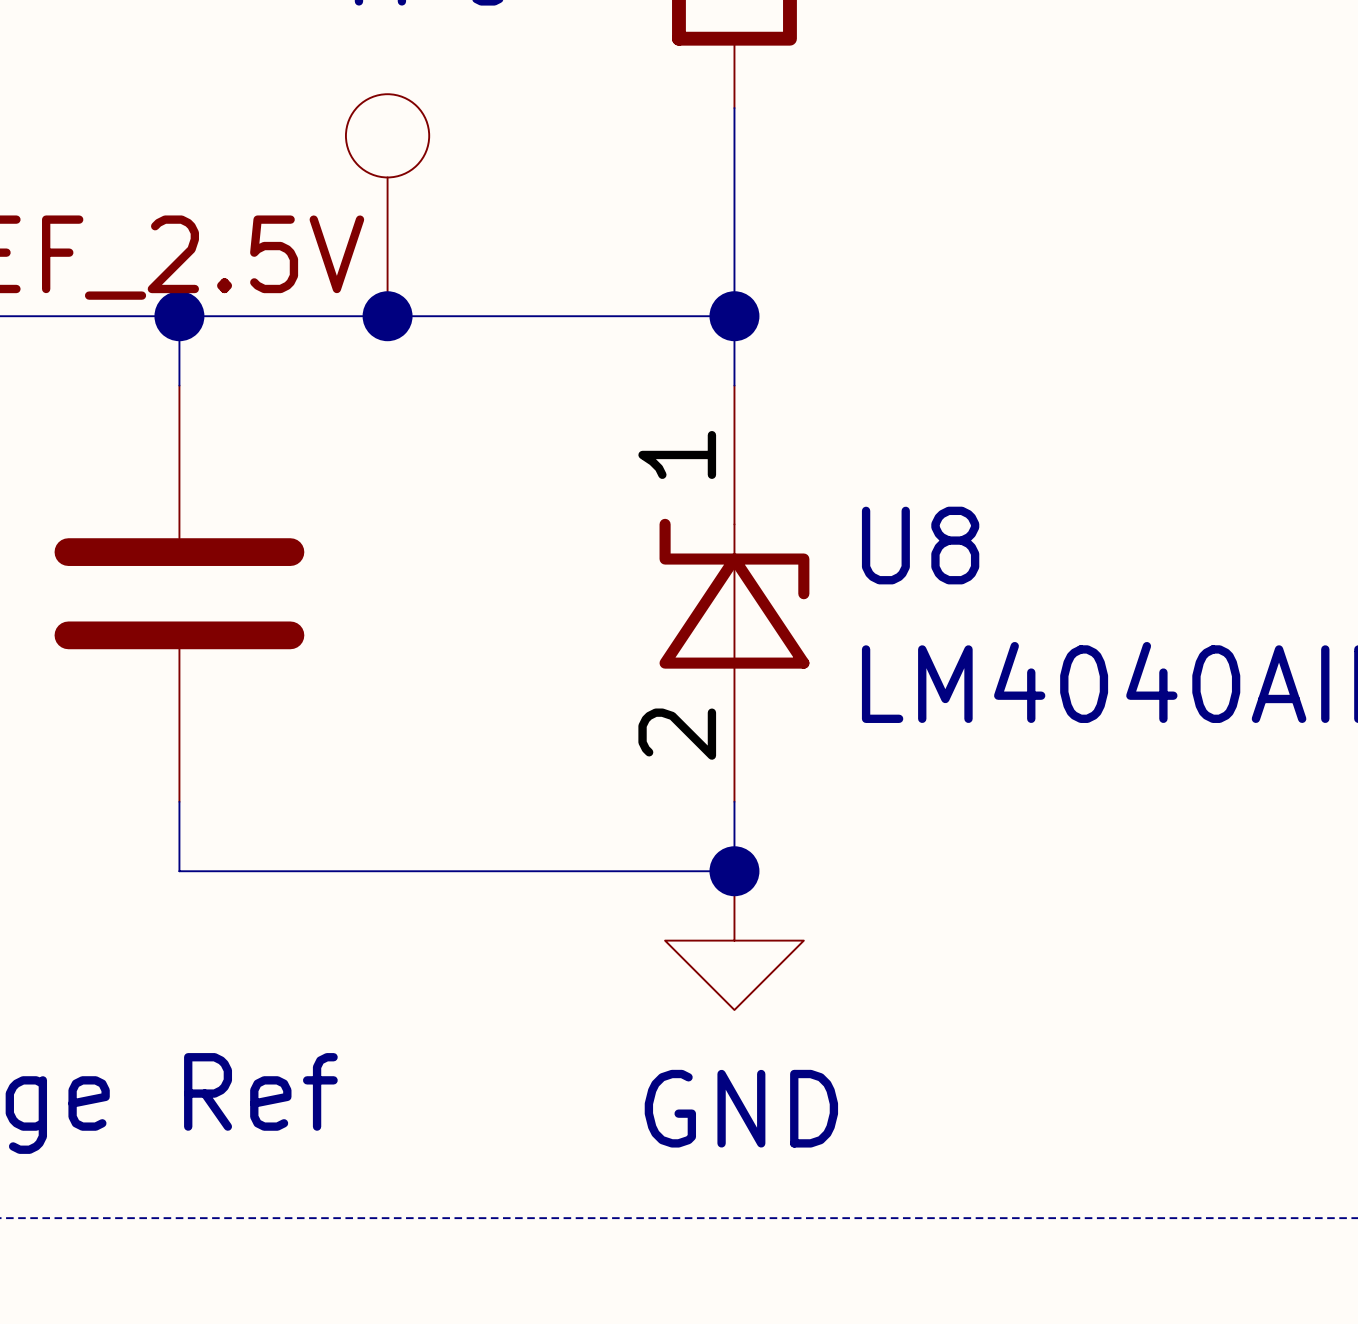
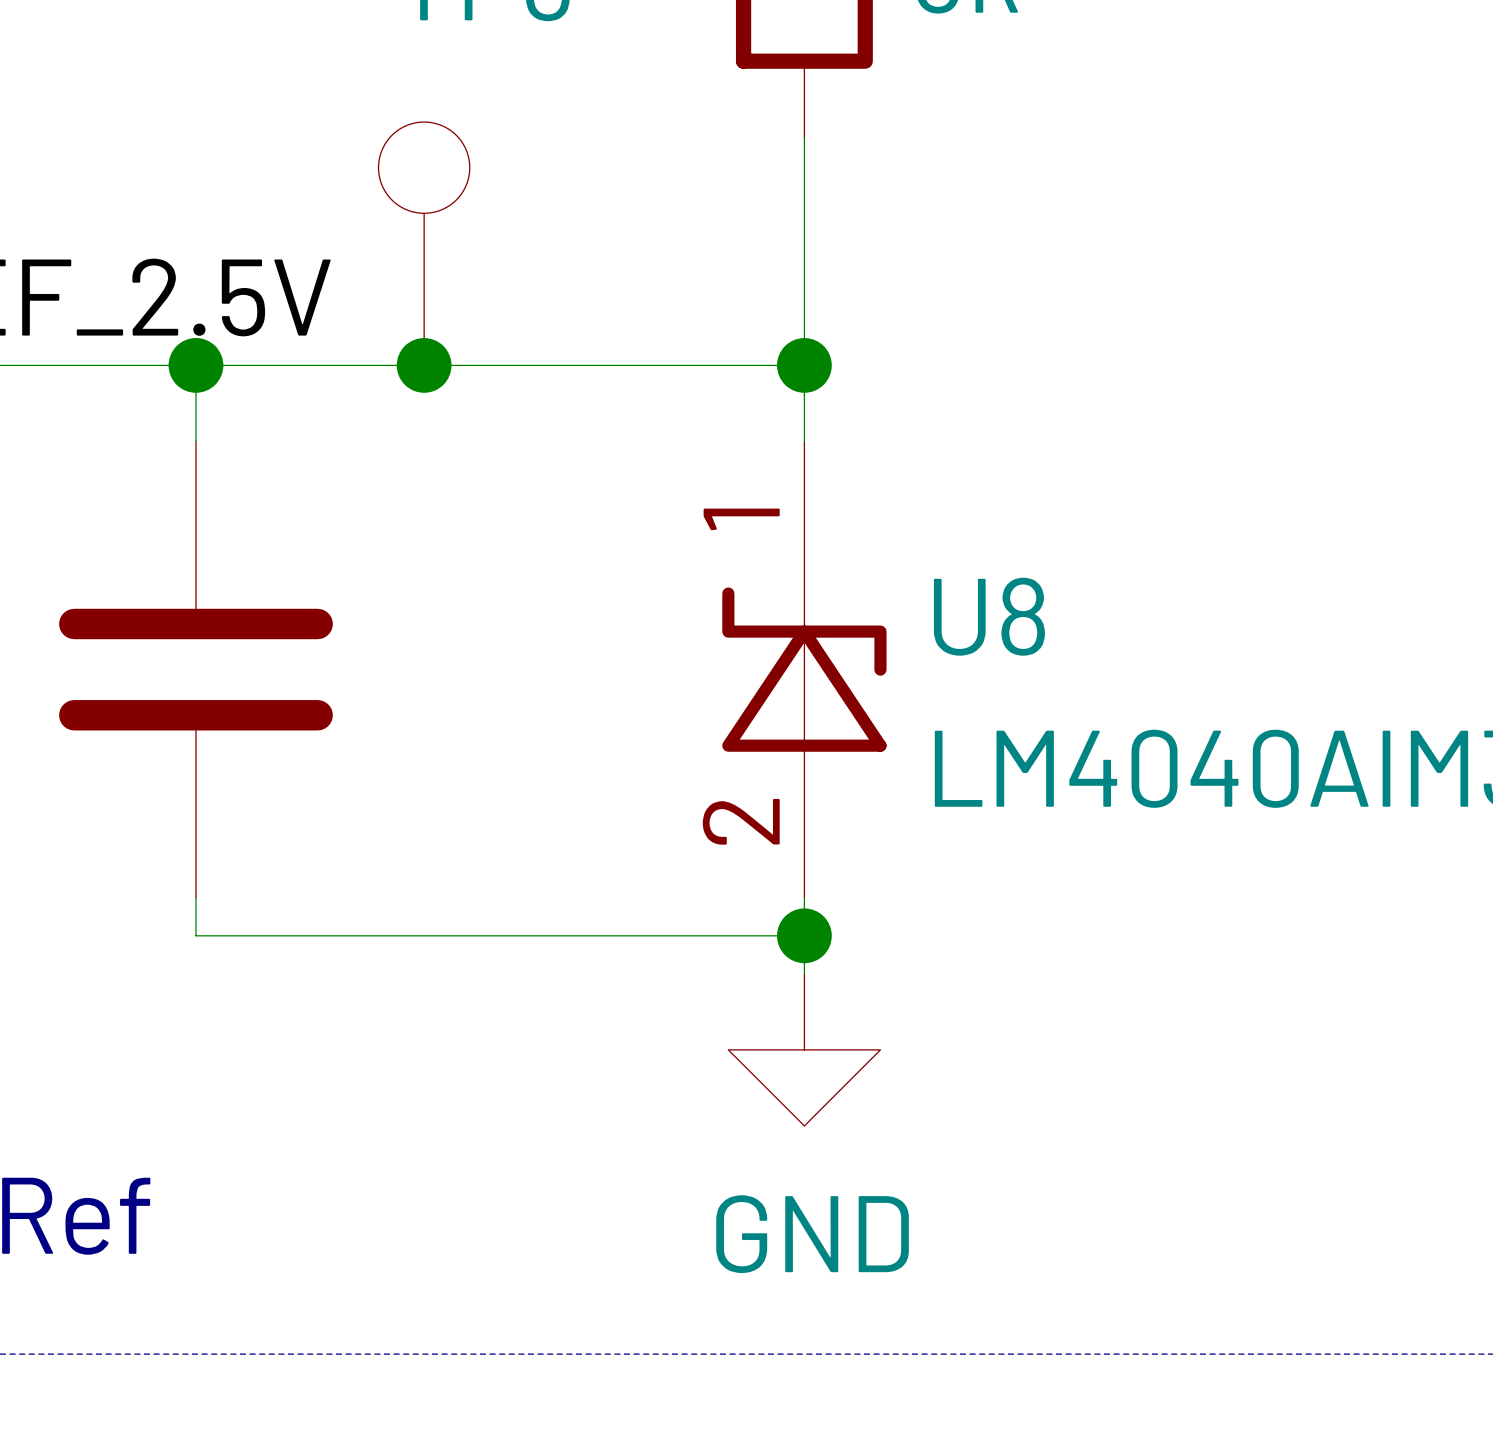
wire: (179, 836) (179, 871) (734, 871) -> (195, 935) (804, 935)
junction position: (734, 871) -> (804, 935)

